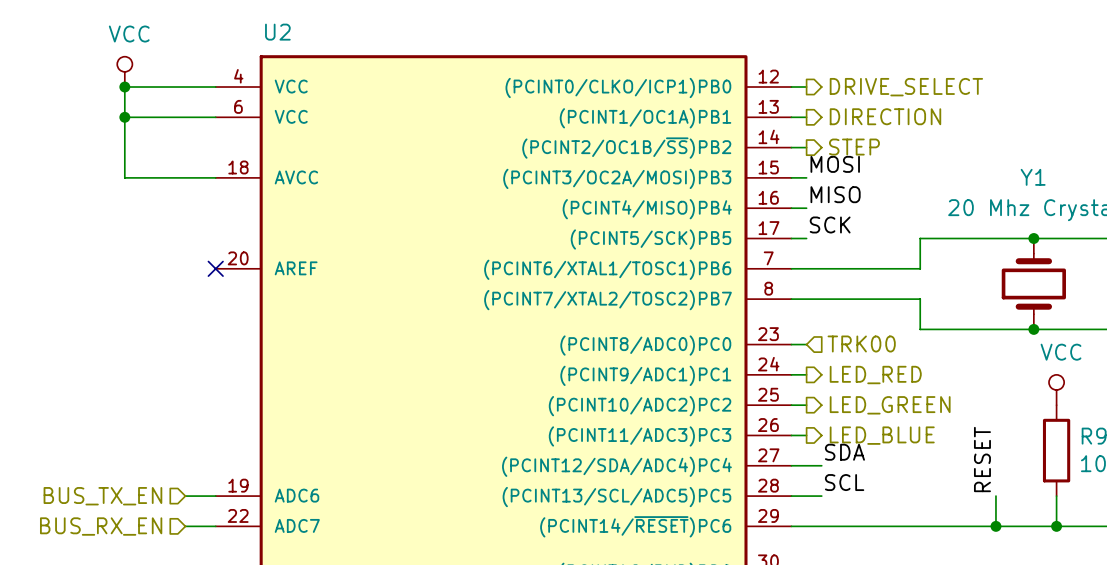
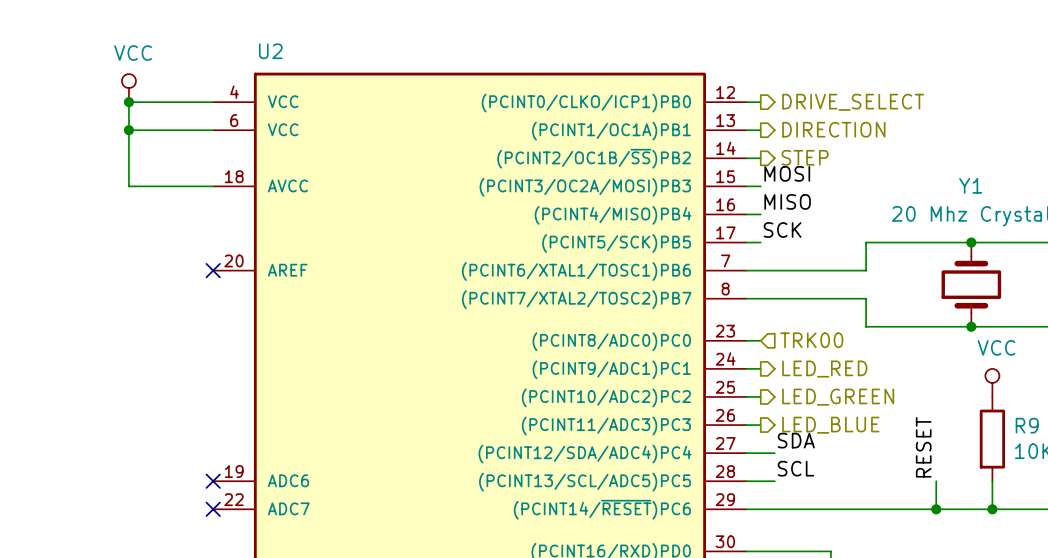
hierarchical label: BUS_TX_EN (102, 496) -> none
wire: (185, 496) (215, 496) -> none
no-connect mark: none -> (213, 481)
hierarchical label: BUS_RX_EN (101, 526) -> none
wire: (185, 526) (215, 526) -> none
no-connect mark: none -> (213, 509)

